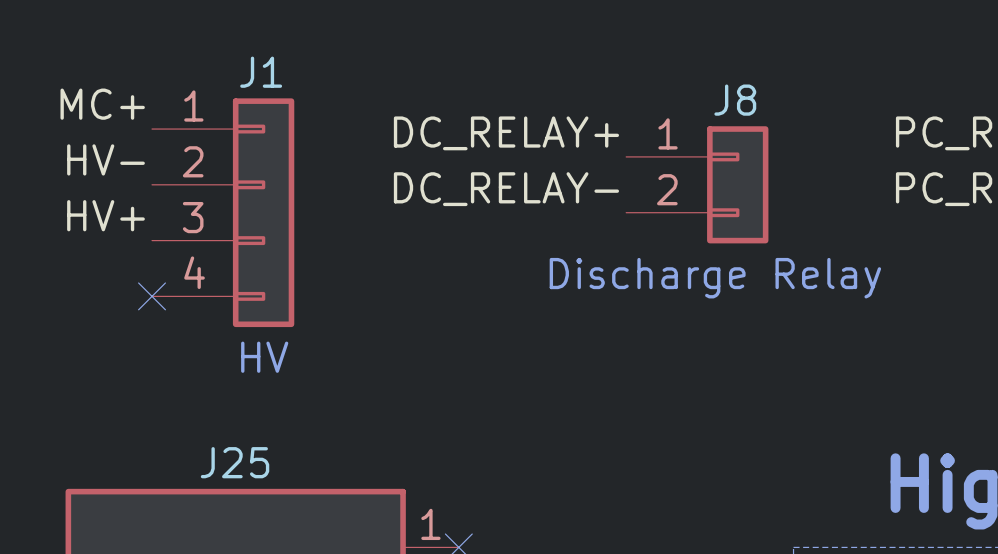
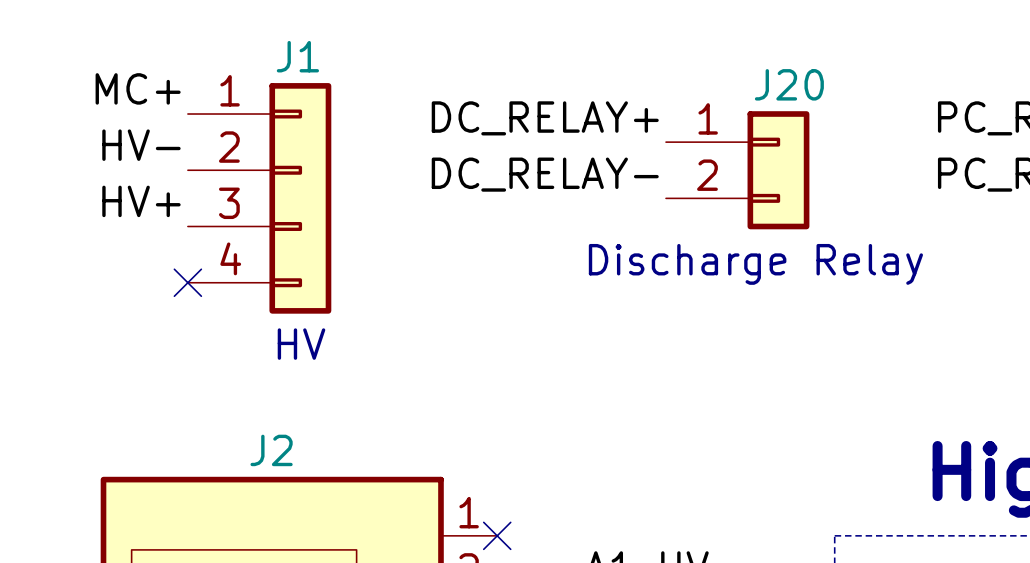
part value: J8 (735, 100) -> J20 (789, 84)
J25 name: J25 (235, 462) -> J2 (271, 450)

